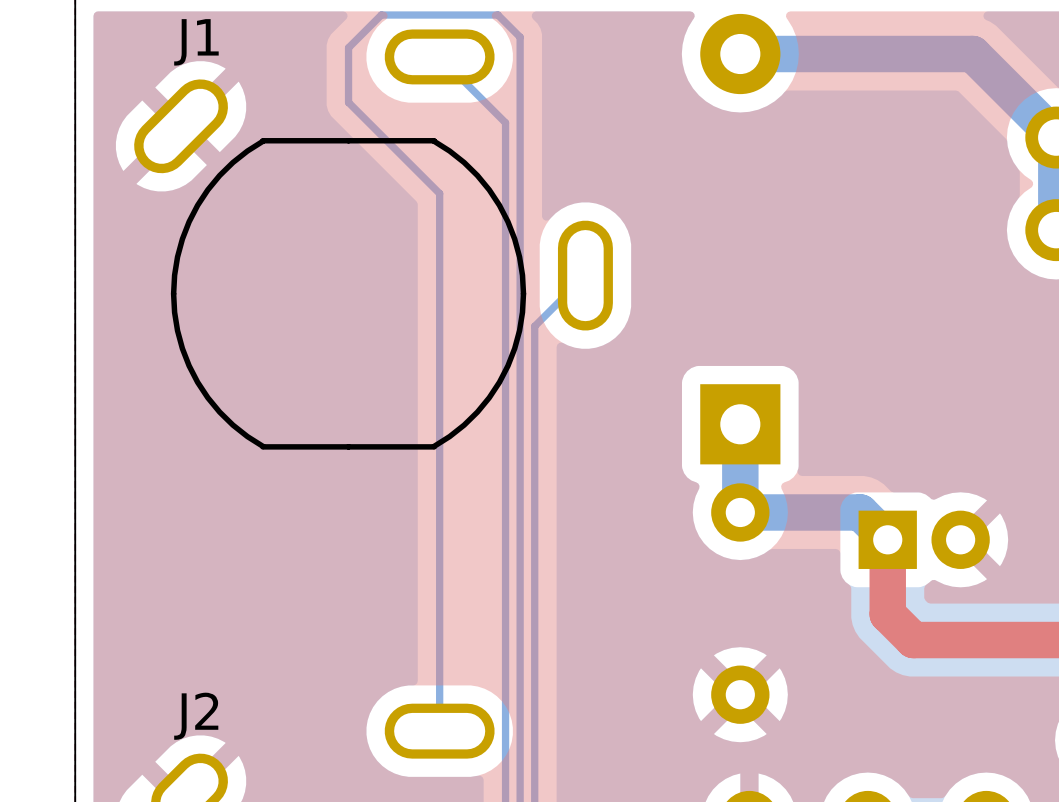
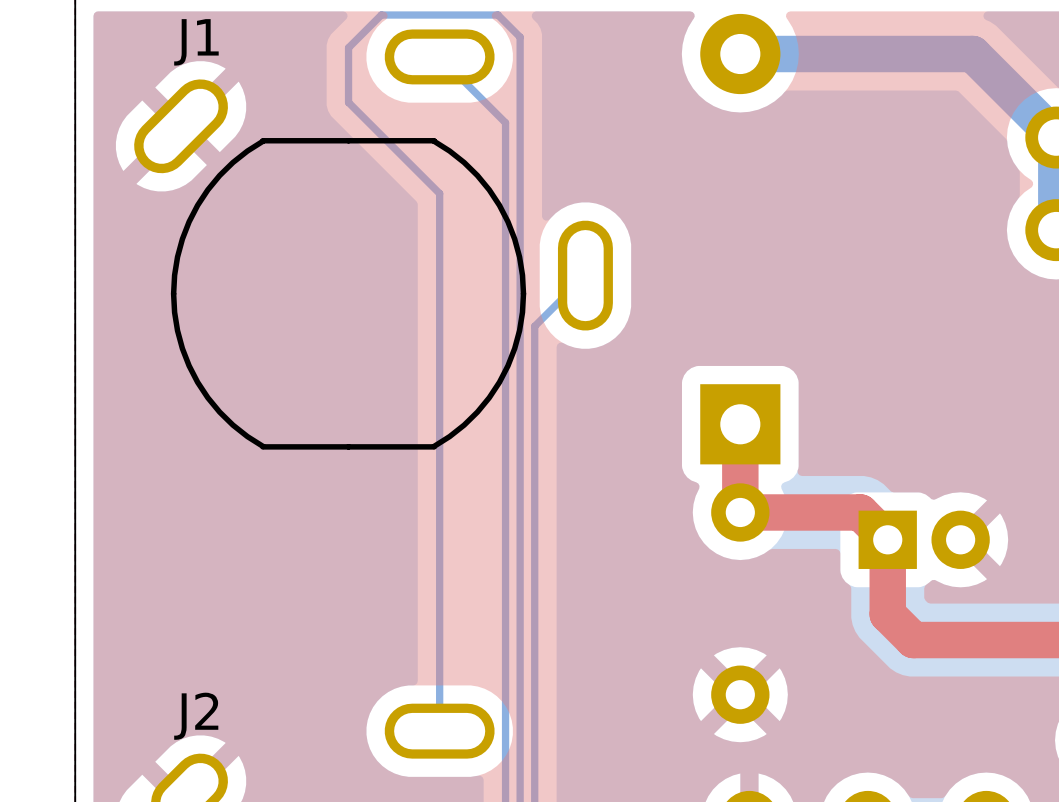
top track: none -> (740, 424) (740, 512) (860, 512) (887, 539)
bottom track: (740, 424) (740, 512) (860, 512) (887, 539) -> none

